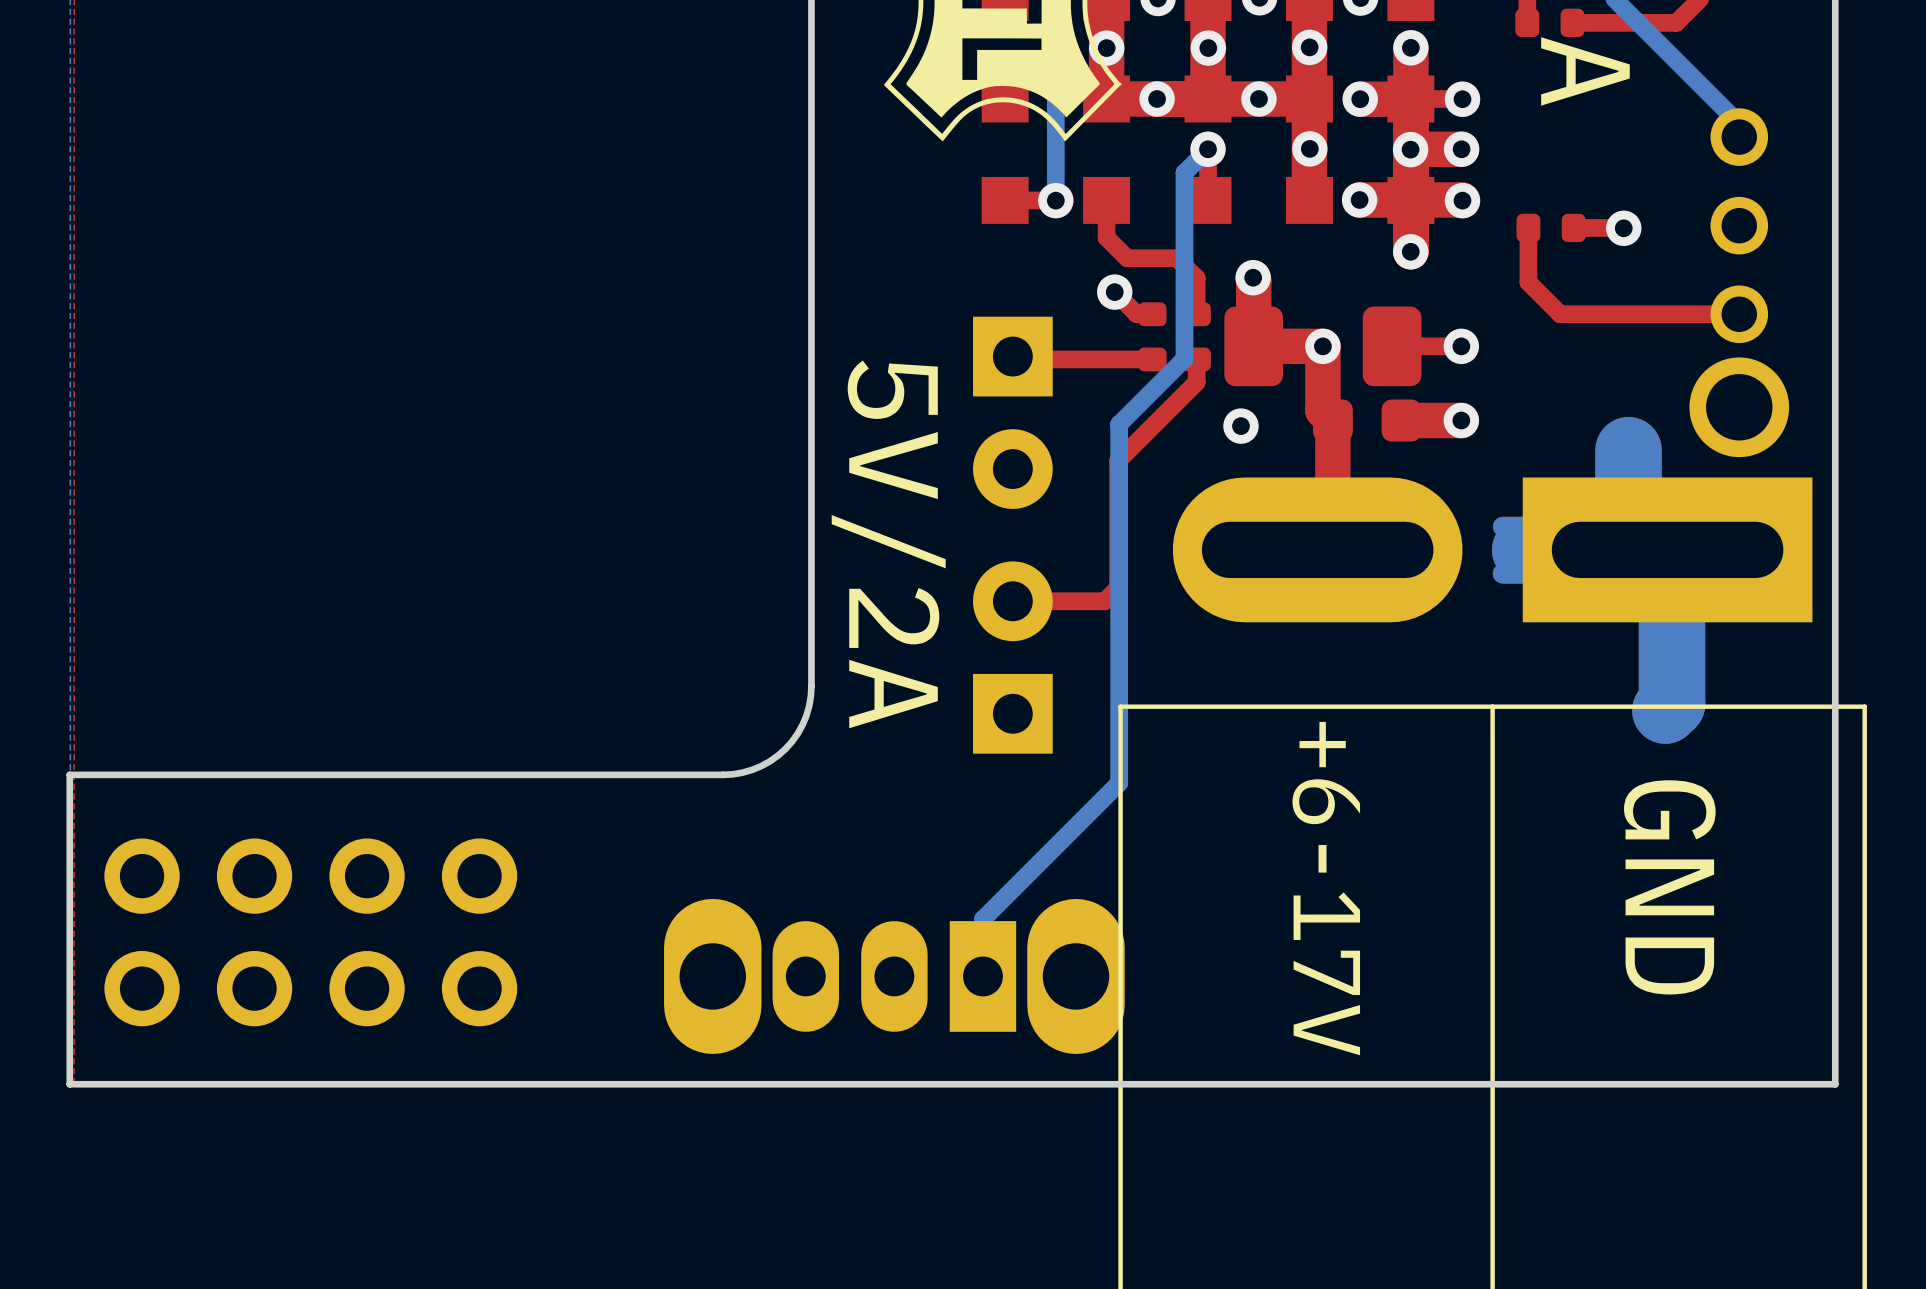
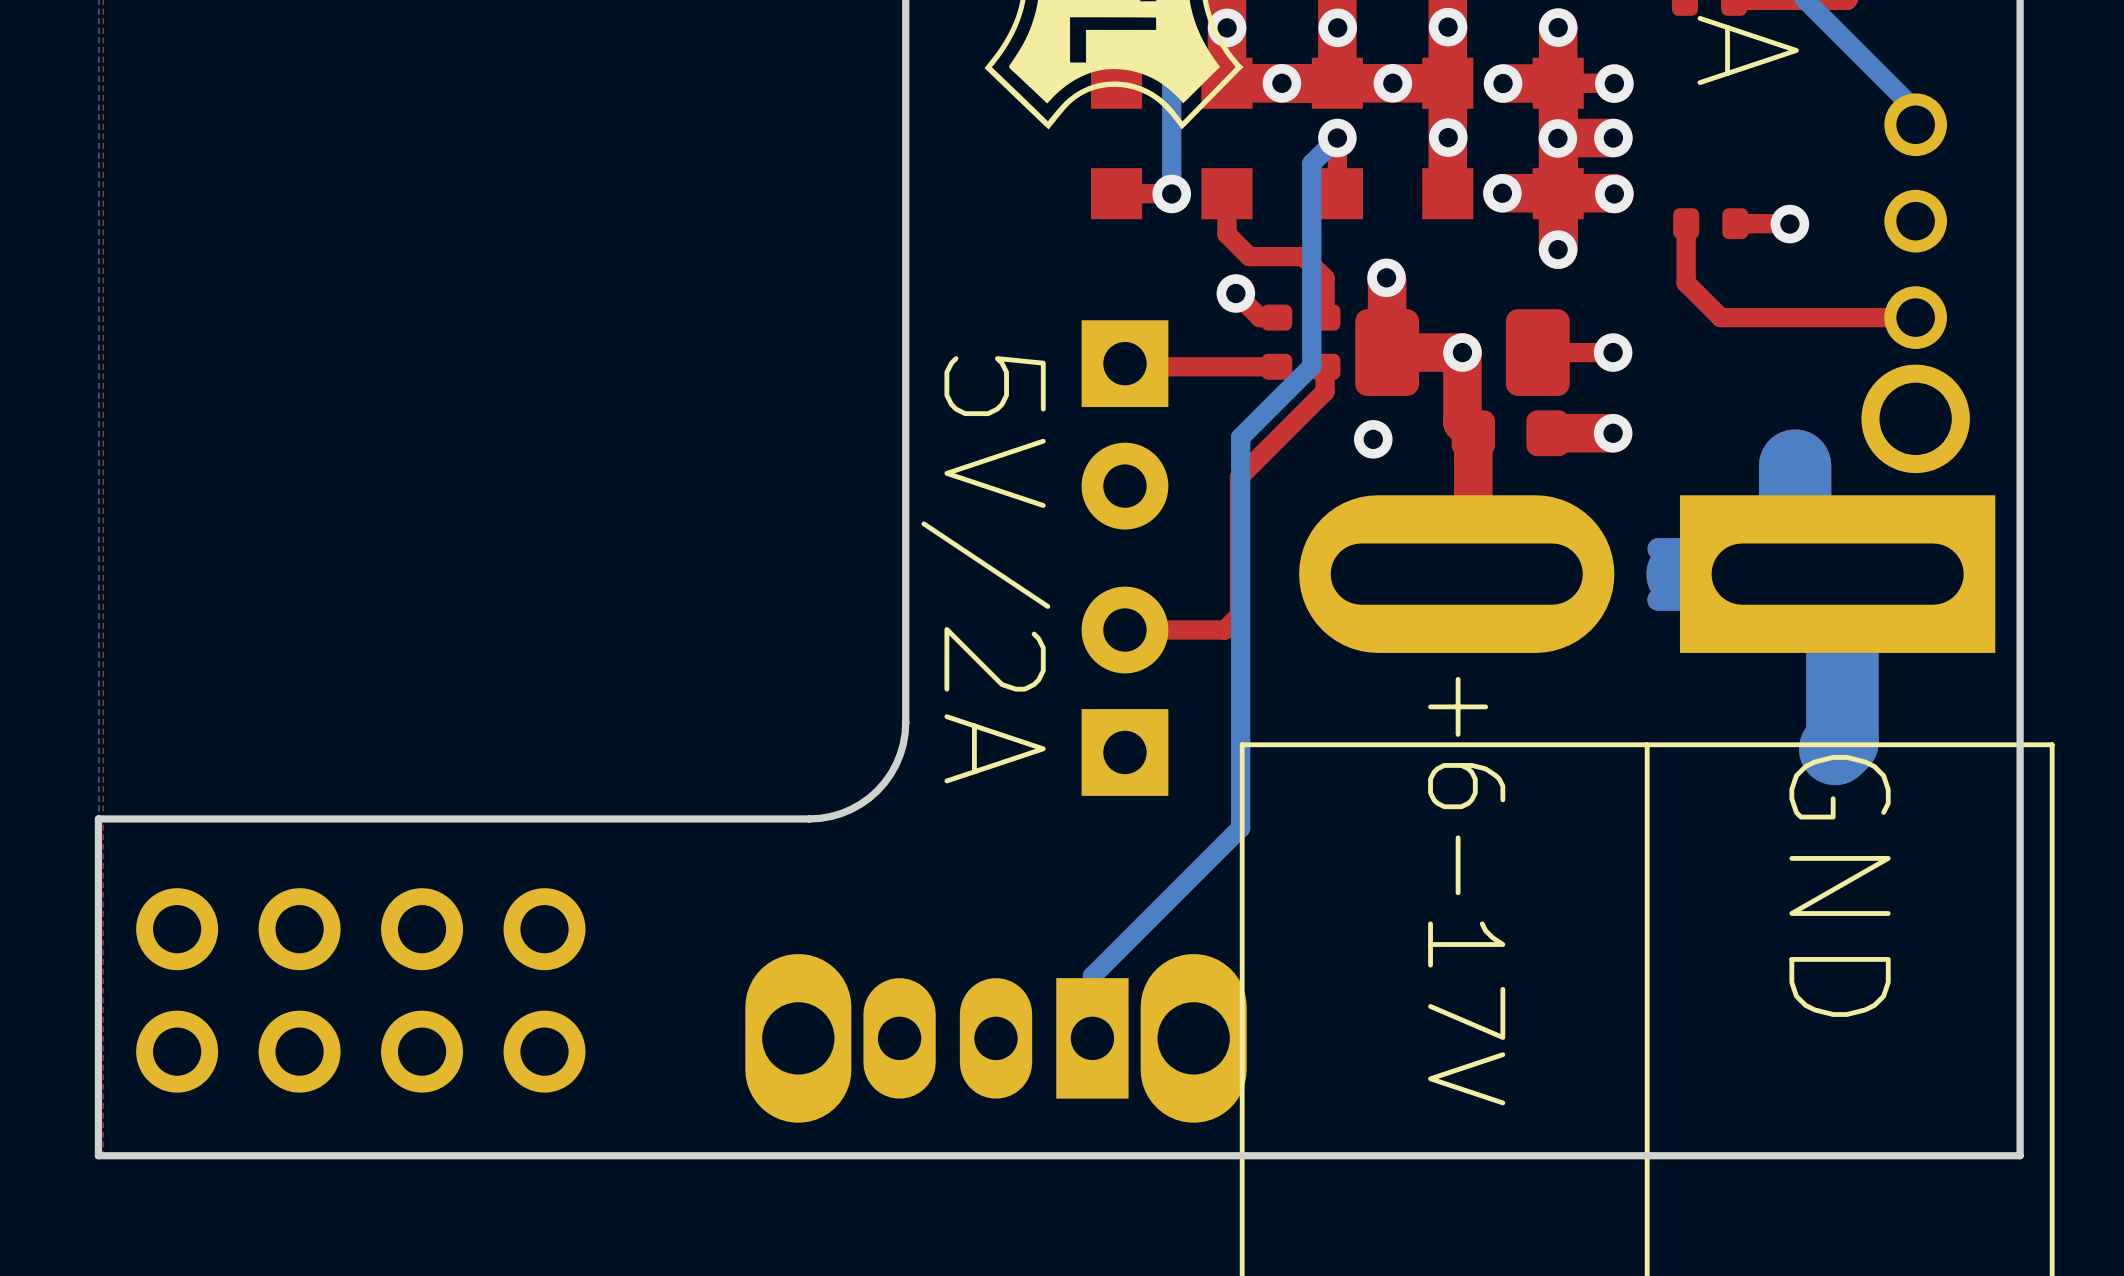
text position: GND (1669, 887) -> GND (1840, 885)
text position: +6-17V (1326, 888) -> +6-17V (1466, 891)

